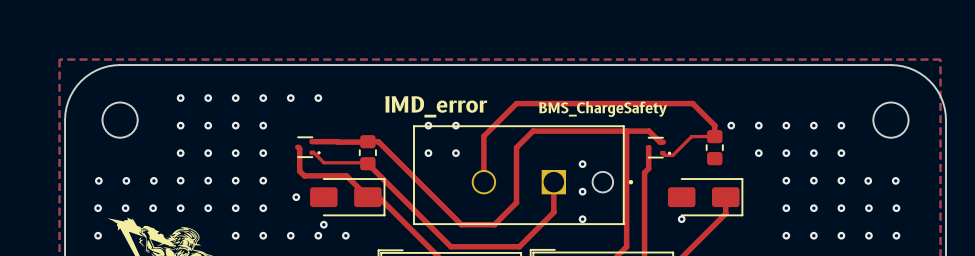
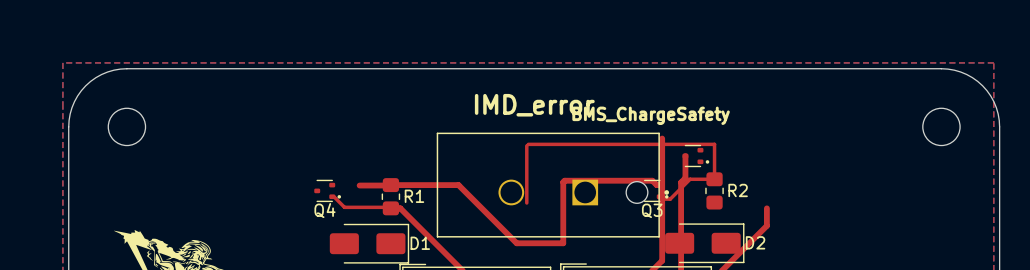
via: (180, 98) -> none
via: (208, 98) -> none
via: (235, 98) -> none
via: (263, 98) -> none
via: (290, 98) -> none
via: (318, 98) -> none
text position: IMD_error (436, 106) -> IMD_error (534, 105)
via: (180, 125) -> none
via: (208, 125) -> none
via: (235, 125) -> none
via: (263, 125) -> none
via: (428, 125) -> none
via: (455, 125) -> none
via: (731, 125) -> none
via: (758, 125) -> none
via: (786, 125) -> none
via: (813, 125) -> none
via: (841, 125) -> none
top track: (312, 141) (378, 141) (461, 224) (494, 224) (516, 202) (516, 147) (533, 131) (649, 131) (660, 142) (662, 142) -> none
top track: (298, 147) (299, 171) (304, 175) (346, 175) (369, 197) -> (332, 196) (344, 207) (390, 208)
part: (307, 147) -> none
part: (714, 147) -> none
top track: (312, 152) (323, 162) (366, 162) (450, 246) (519, 246) (553, 212) (553, 182) -> none
part: (367, 152) -> none
via: (180, 153) -> none
via: (208, 153) -> none
via: (235, 153) -> none
via: (263, 153) -> none
via: (428, 153) -> none
via: (455, 153) -> none
top track: (662, 153) (665, 155) (672, 155) (691, 136) (714, 136) (714, 125) (692, 103) (516, 103) (483, 136) (483, 182) -> none
via: (758, 153) -> none
via: (786, 153) -> none
via: (813, 153) -> none
via: (841, 153) -> none
via: (582, 164) -> none
top track: none -> (659, 185) (656, 185) (652, 180) (564, 180) (563, 243) (516, 243) (458, 185) (359, 185)
via: (98, 180) -> none
via: (126, 180) -> none
via: (153, 180) -> none
via: (180, 180) -> none
via: (208, 180) -> none
via: (235, 180) -> none
via: (263, 180) -> none
Q4: none -> (327, 190)
Q3: none -> (655, 190)
R2: none -> (714, 190)
via: (786, 180) -> none
via: (813, 180) -> none
via: (841, 180) -> none
via: (868, 180) -> none
via: (895, 180) -> none
R1: none -> (390, 196)
top track: none -> (659, 196) (662, 199) (670, 199) (690, 179) (714, 179) (714, 144) (528, 144) (526, 145) (526, 202)
via: (582, 191) -> none
via: (296, 197) -> none
part: (347, 197) -> none
part: (705, 197) -> none
via: (98, 208) -> none
via: (125, 208) -> none
via: (153, 208) -> none
via: (180, 208) -> none
via: (208, 208) -> none
via: (235, 208) -> none
via: (263, 208) -> none
via: (786, 208) -> none
via: (813, 208) -> none
via: (841, 208) -> none
via: (868, 208) -> none
via: (896, 208) -> none
via: (582, 219) -> none
via: (681, 219) -> none
via: (323, 224) -> none
D1: none -> (369, 243)
D2: none -> (704, 243)
via: (98, 235) -> none
via: (235, 235) -> none
via: (263, 235) -> none
via: (290, 235) -> none
via: (318, 235) -> none
via: (345, 235) -> none
via: (786, 235) -> none
via: (813, 235) -> none
via: (841, 235) -> none
via: (868, 235) -> none
via: (896, 235) -> none

